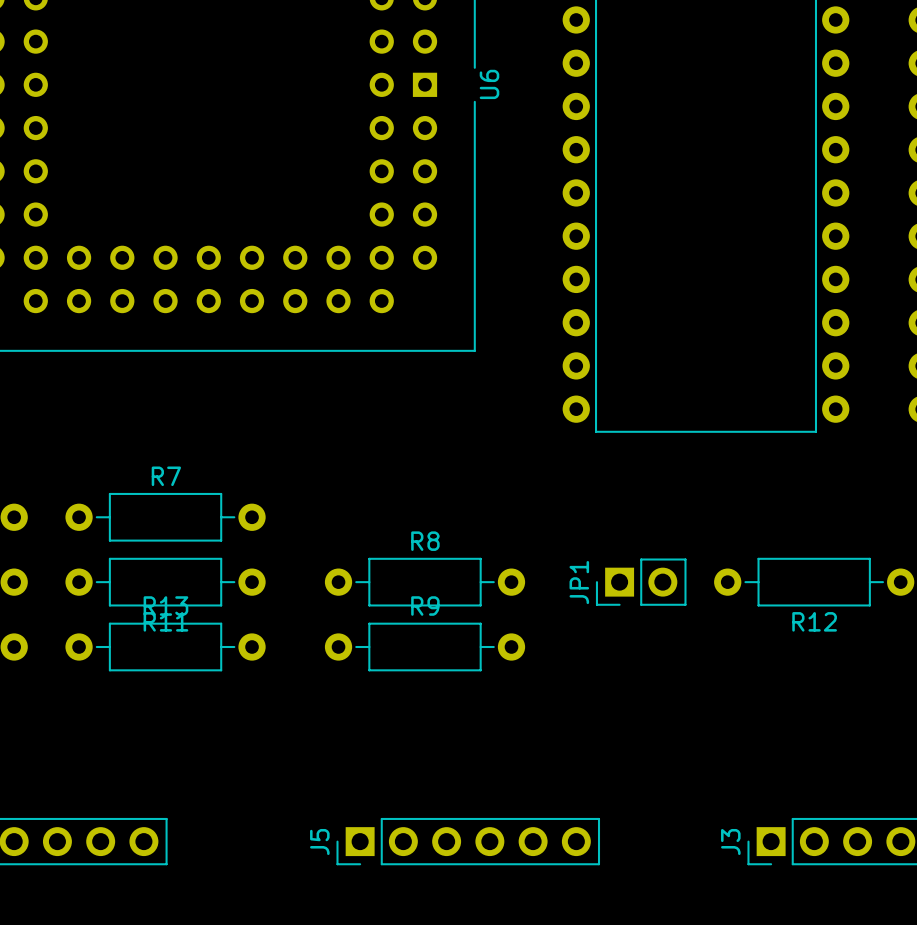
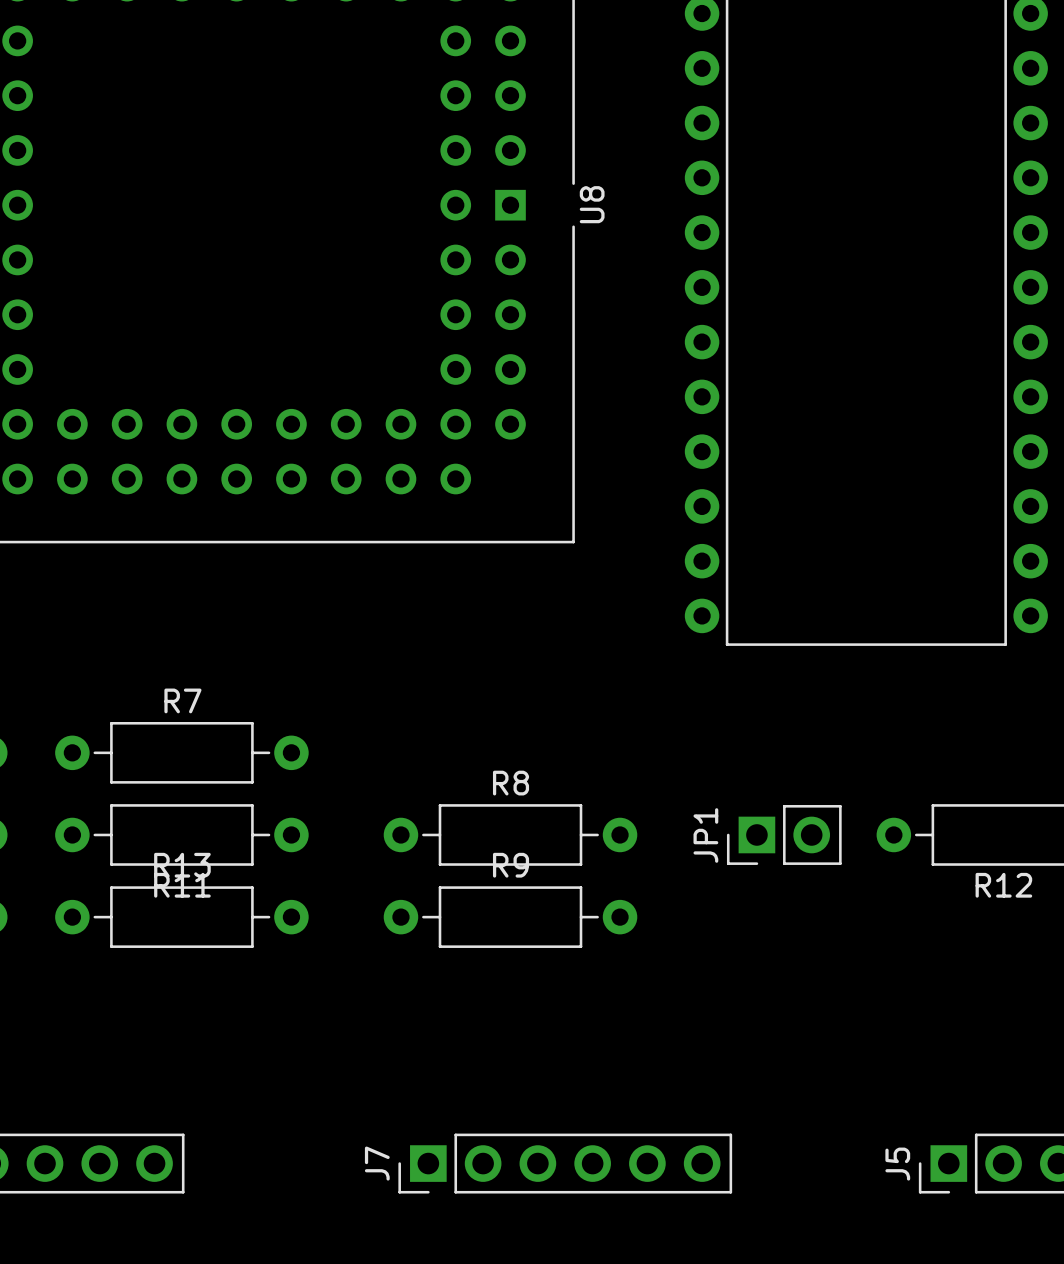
U6 name: U6 (489, 84) -> U8 (592, 204)
J5 name: J5 (319, 842) -> J7 (377, 1163)
J3 name: J3 (730, 842) -> J5 (897, 1164)

